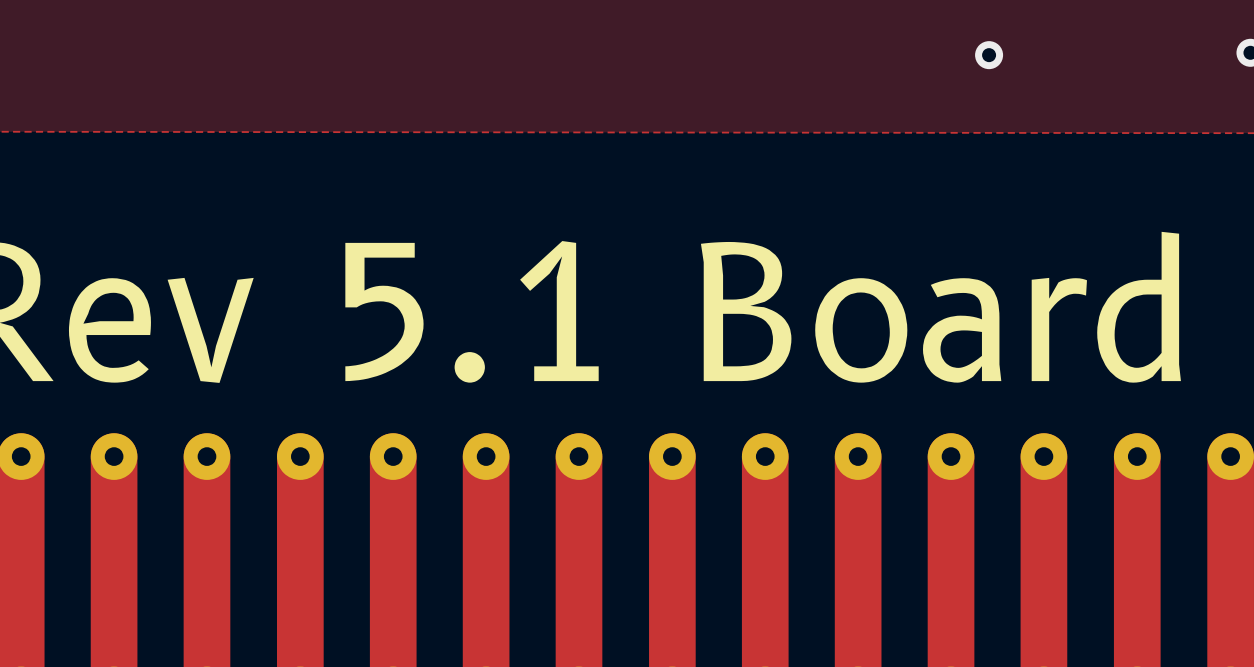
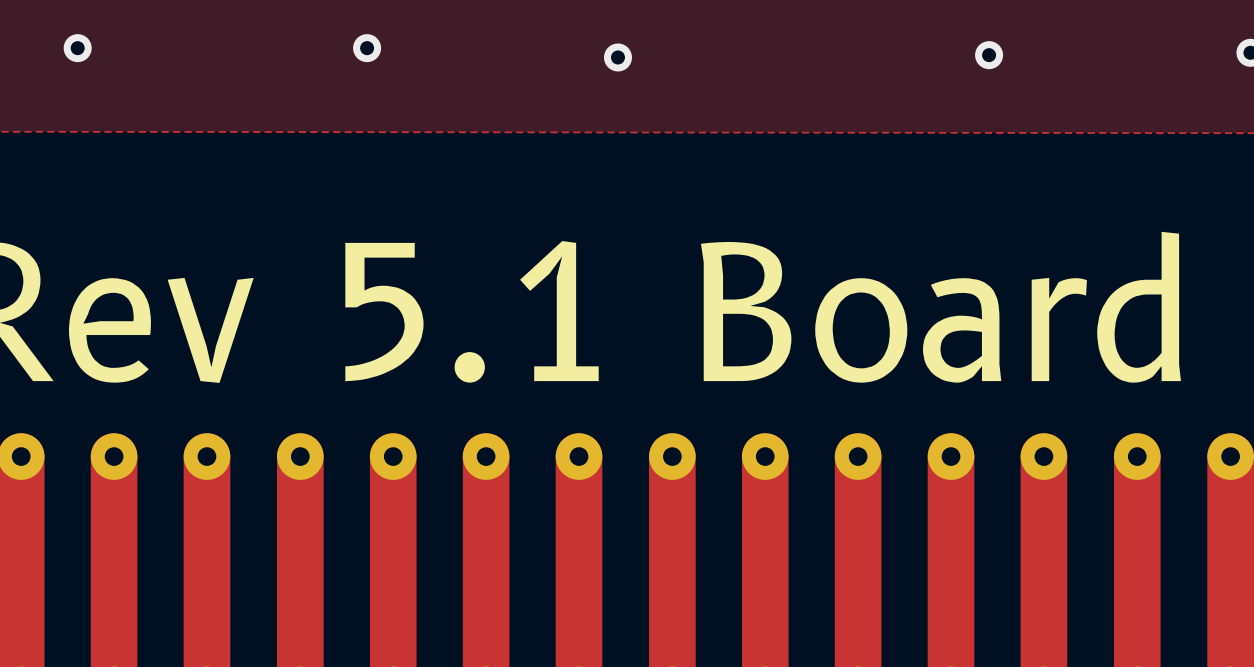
via: none -> (77, 48)
via: none -> (367, 48)
via: none -> (617, 57)

